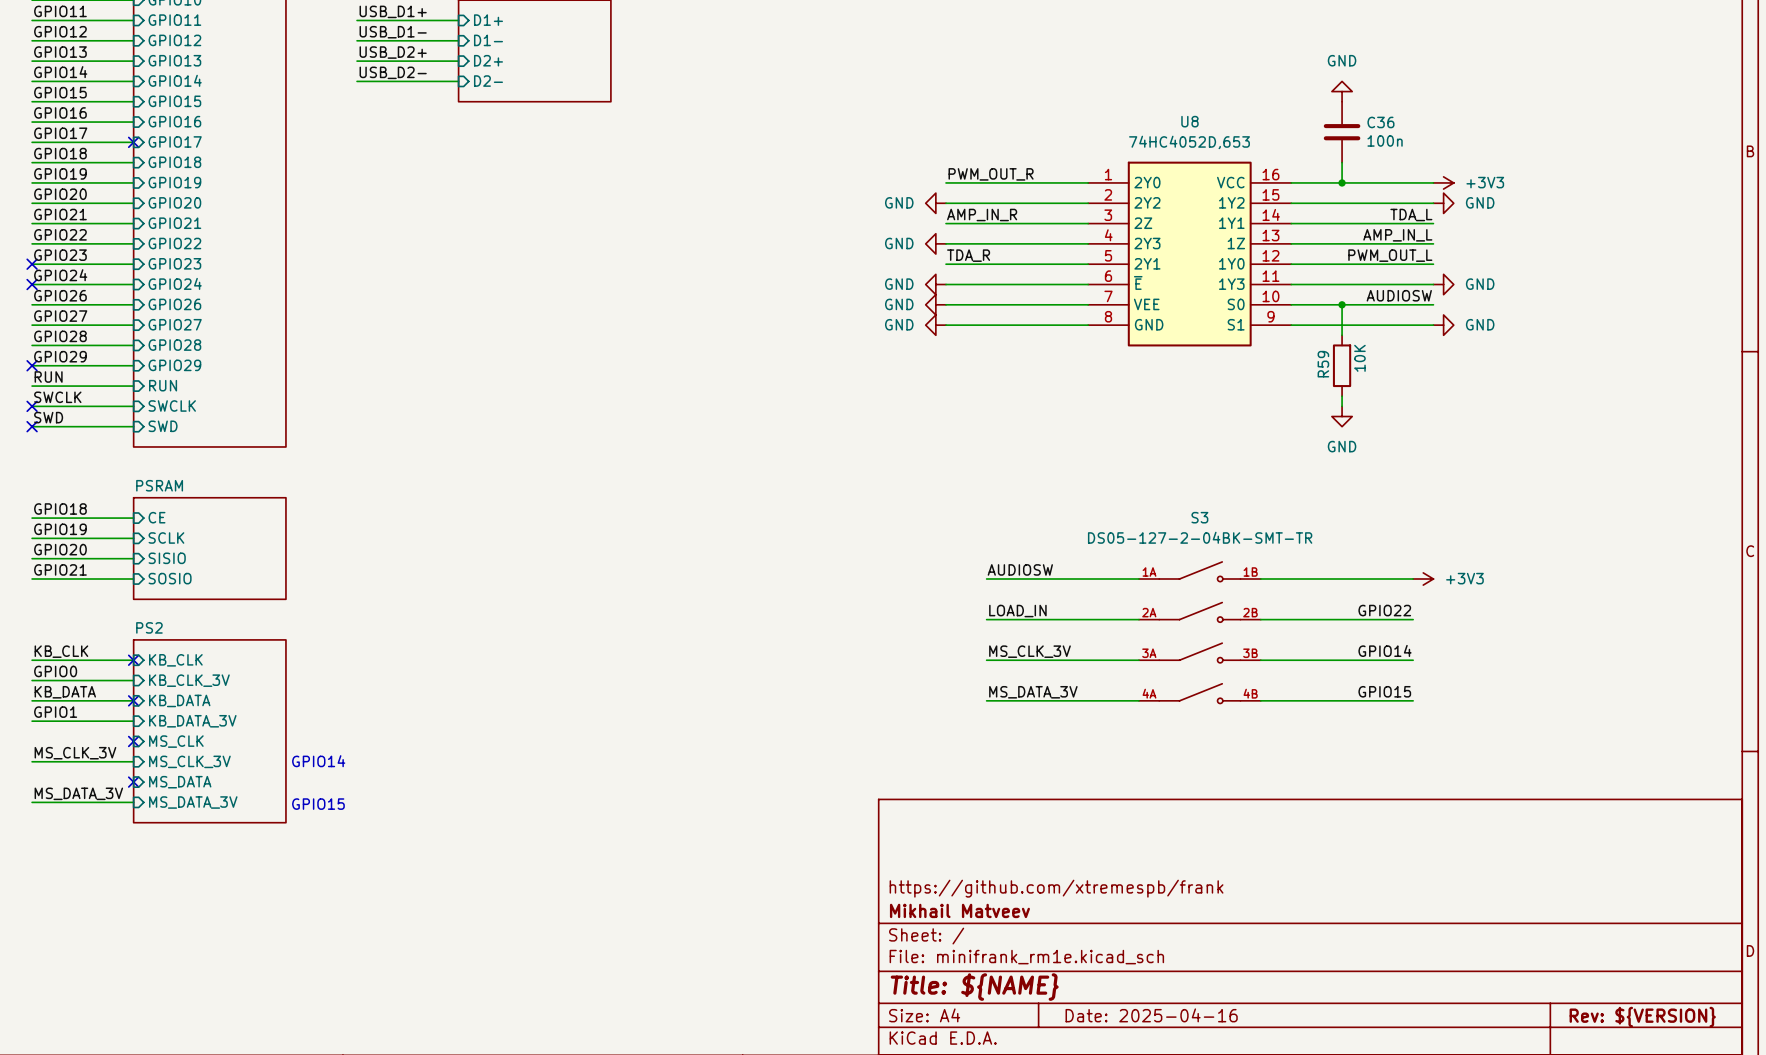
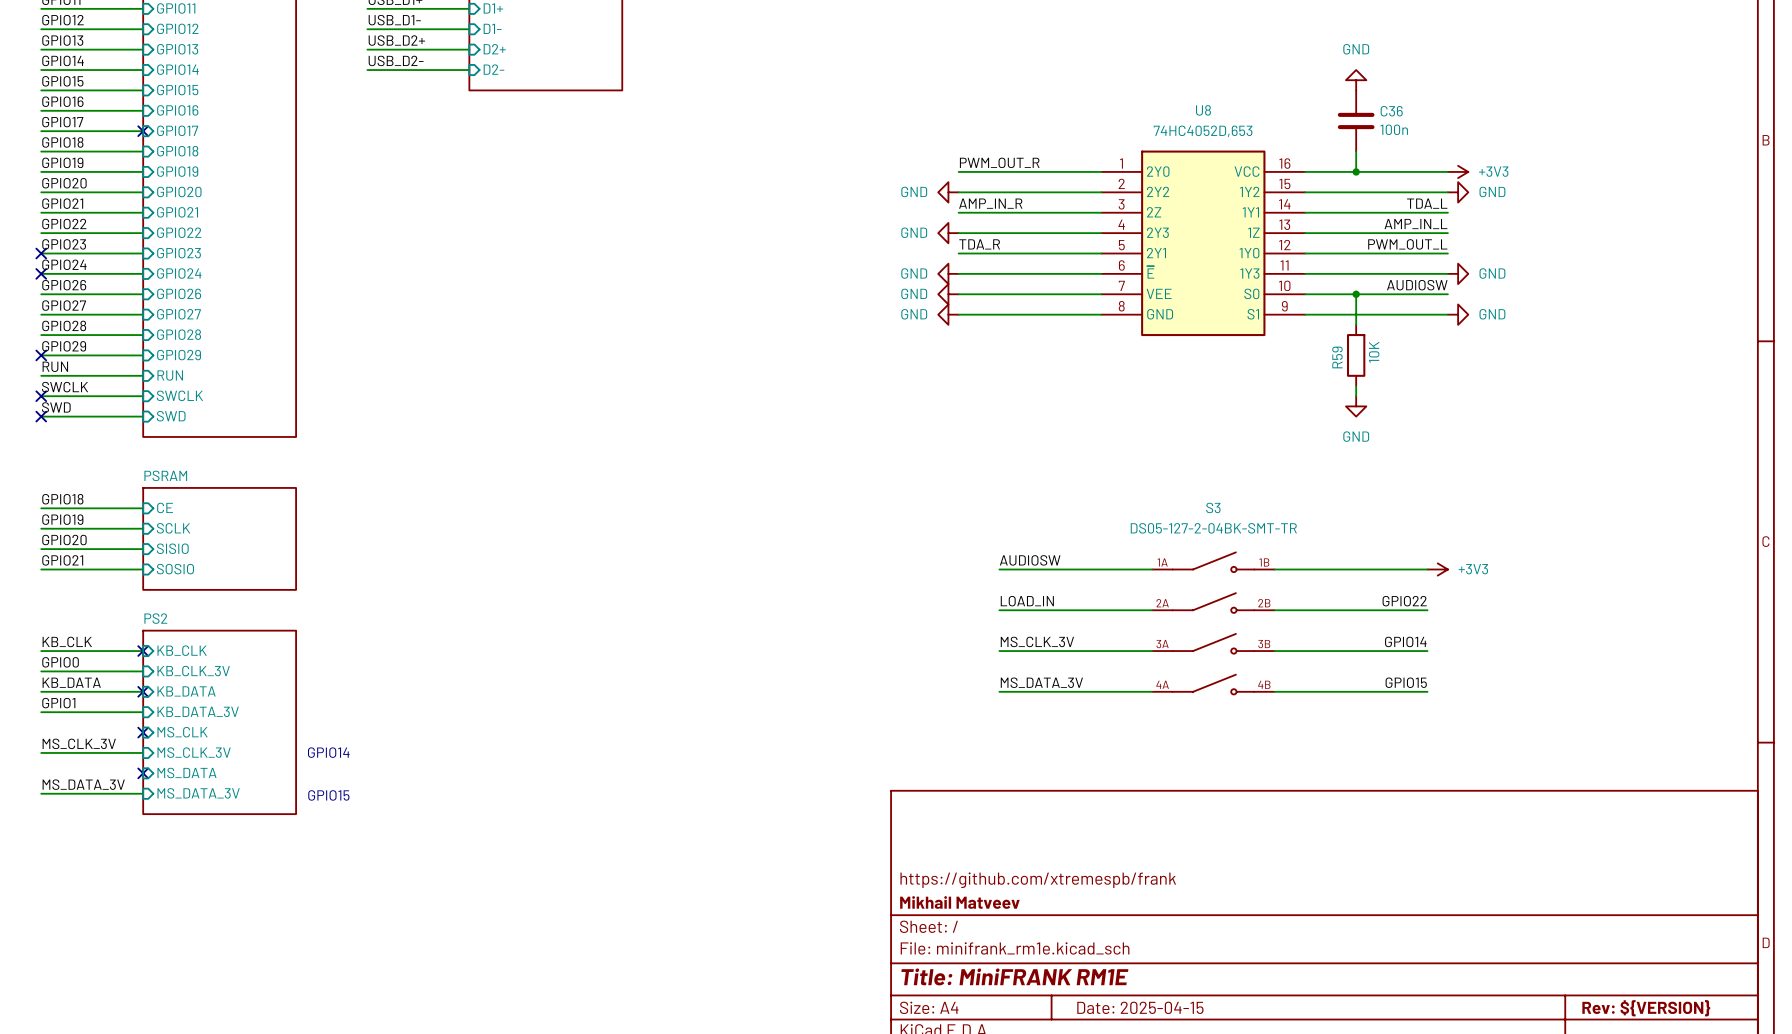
title block: Title: ${NAME} (974, 987) -> Title: MiniFRANK RM1E (1014, 976)
title block: Date: 2025-04-16 (1151, 1015) -> Date: 2025-04-15 (1140, 1007)

